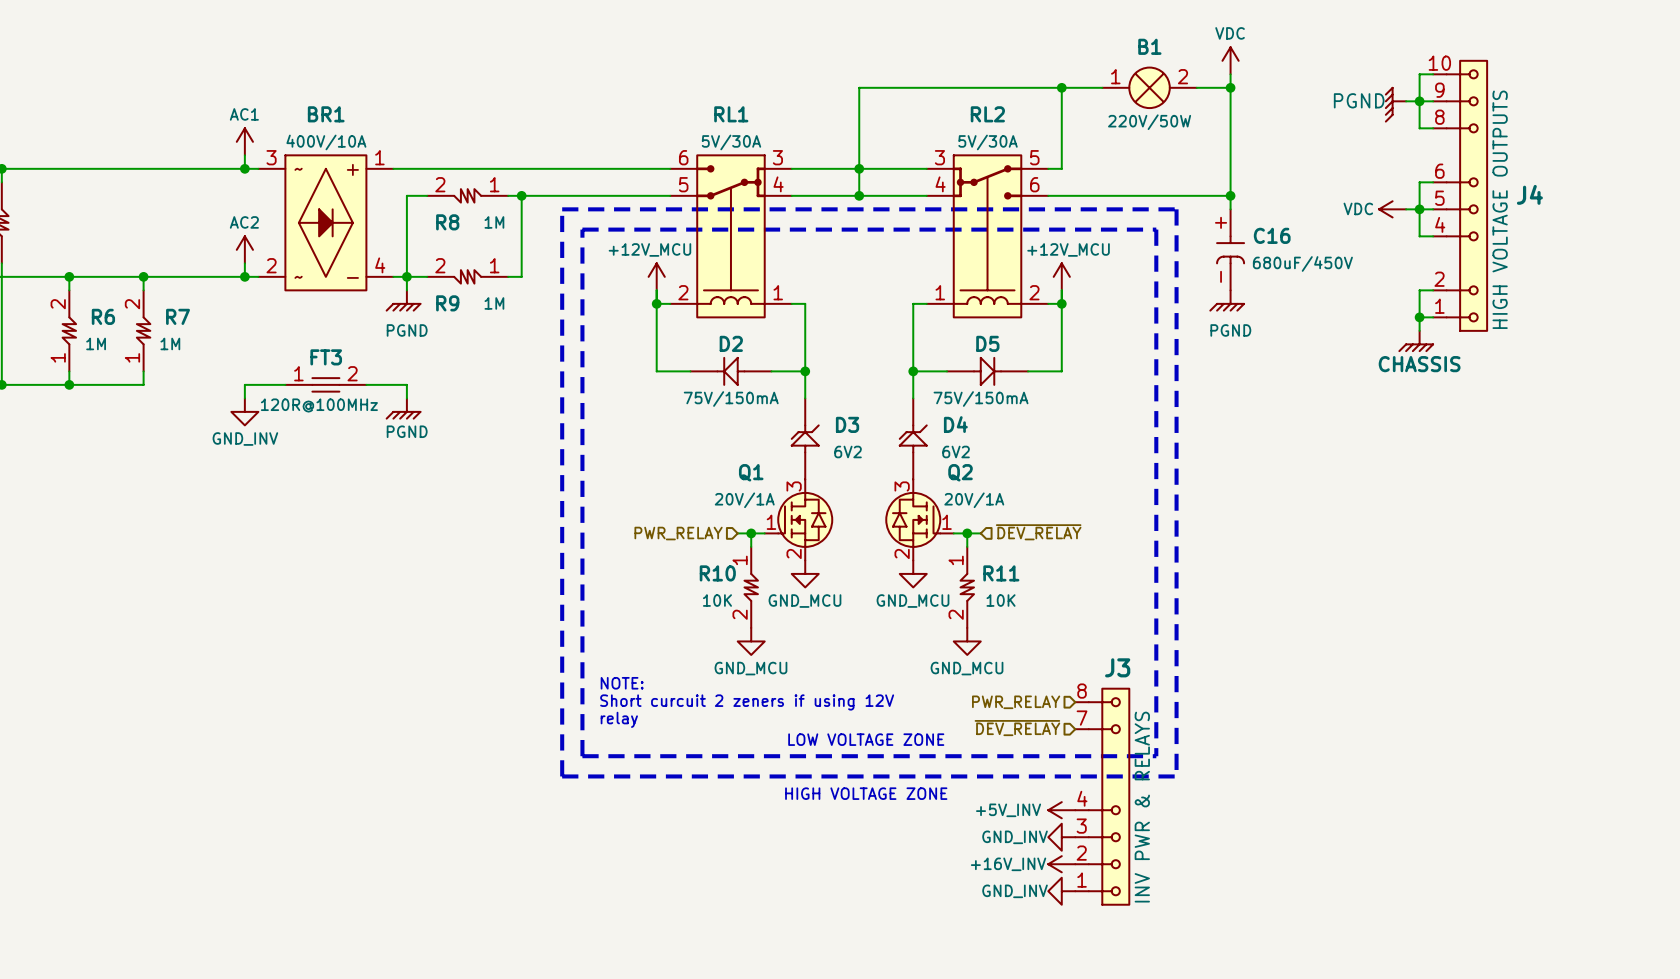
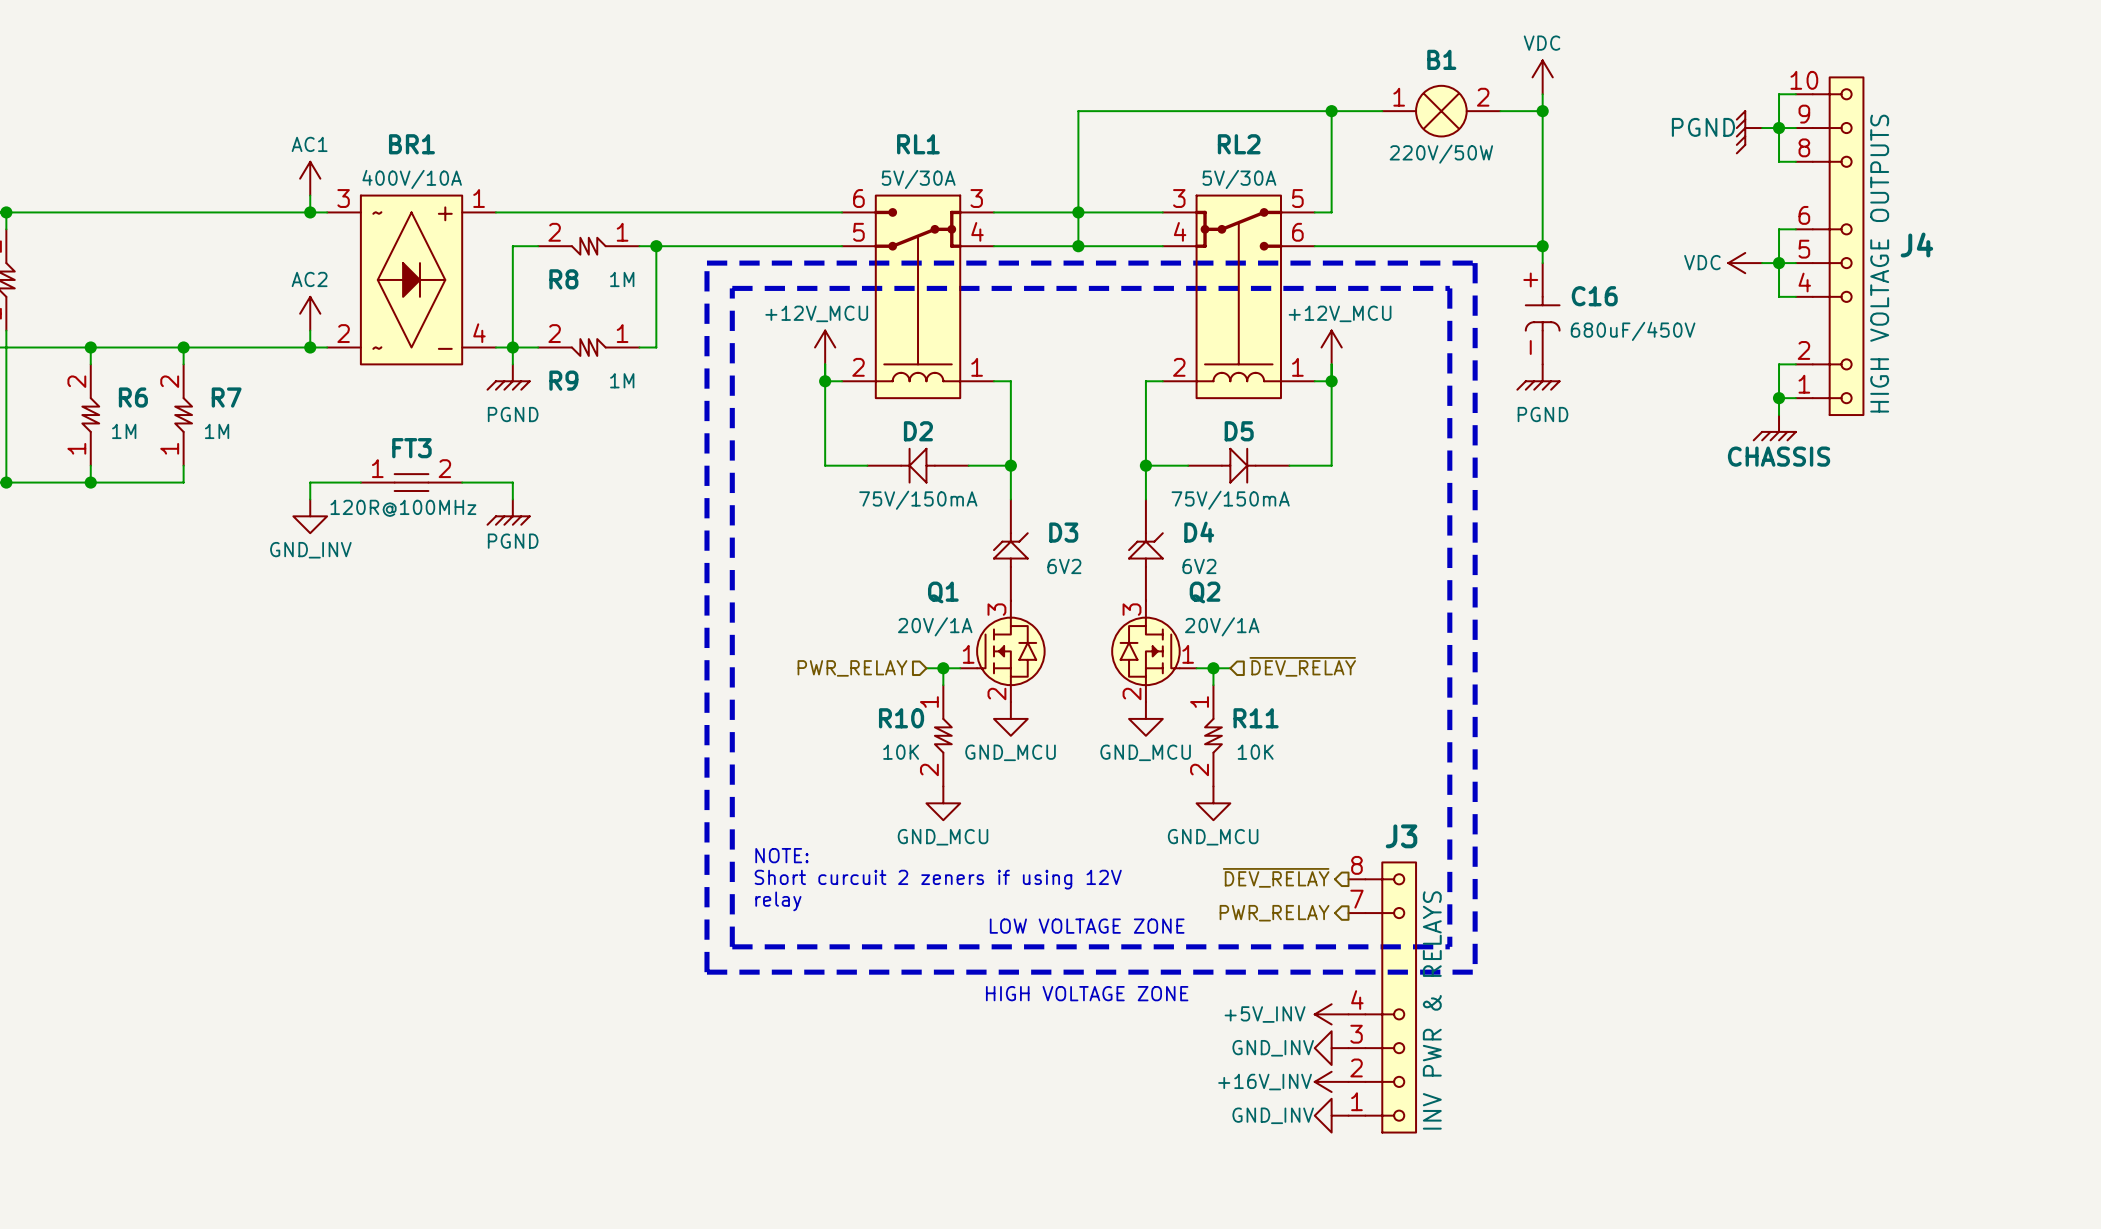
RL2 pin number: 1 (940, 292) -> 2 (1179, 367)
RL2 pin number: 2 (1034, 292) -> 1 (1297, 367)
hierarchical label shape: input (1016, 702) -> output (1276, 877)
hierarchical label: PWR_RELAY (1016, 702) -> ~{DEV_RELAY} (1276, 877)
hierarchical label shape: input (1017, 728) -> output (1274, 913)
hierarchical label: ~{DEV_RELAY} (1017, 728) -> PWR_RELAY (1274, 913)

